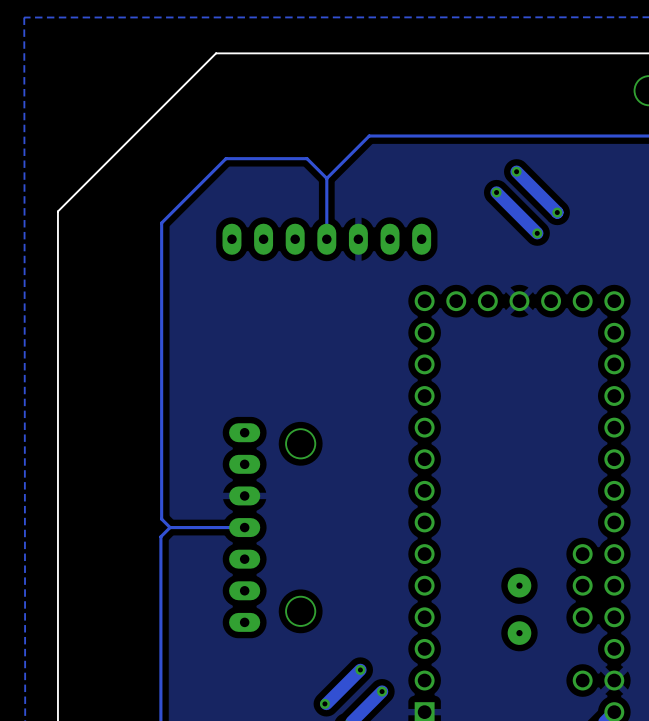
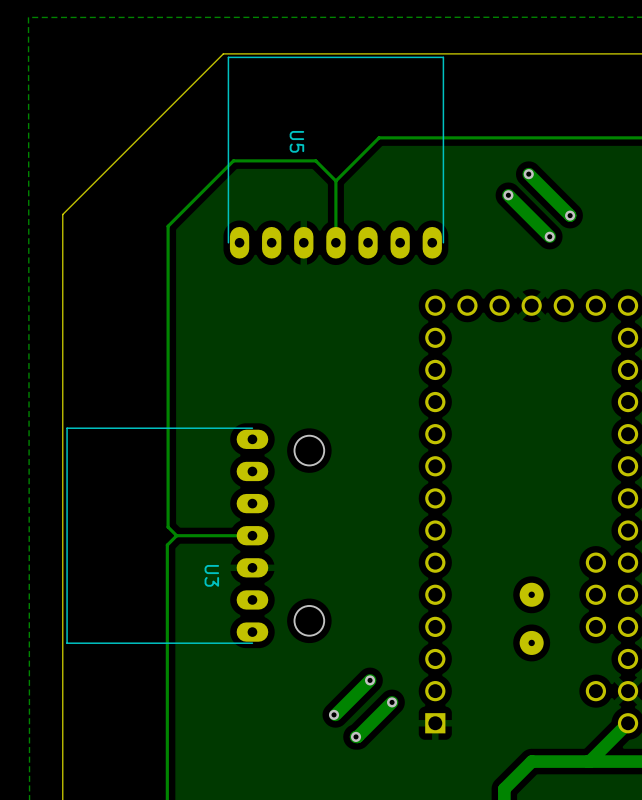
U5 side: top (326, 239) -> bottom (335, 157)
U3 side: top (244, 527) -> bottom (167, 535)

